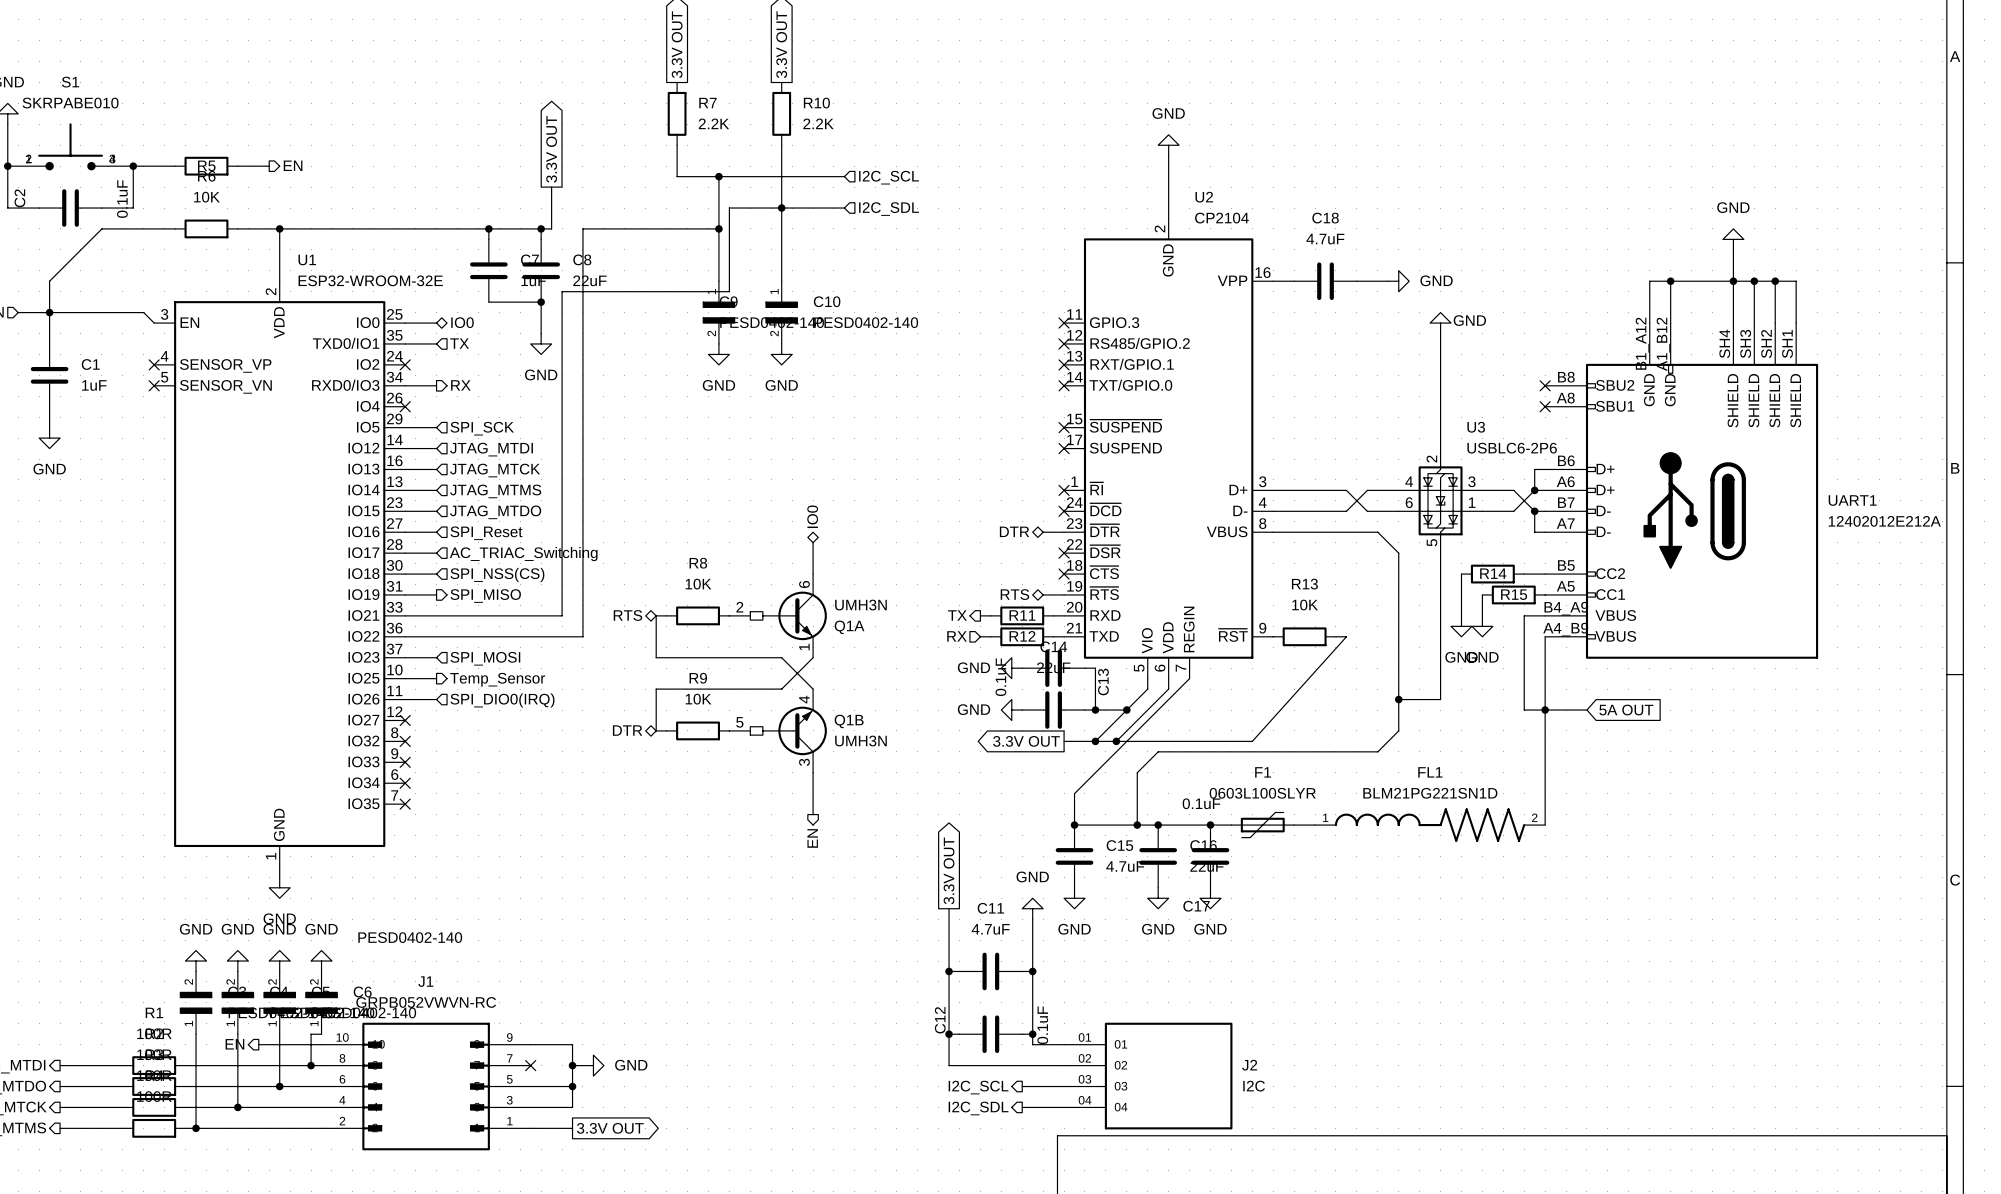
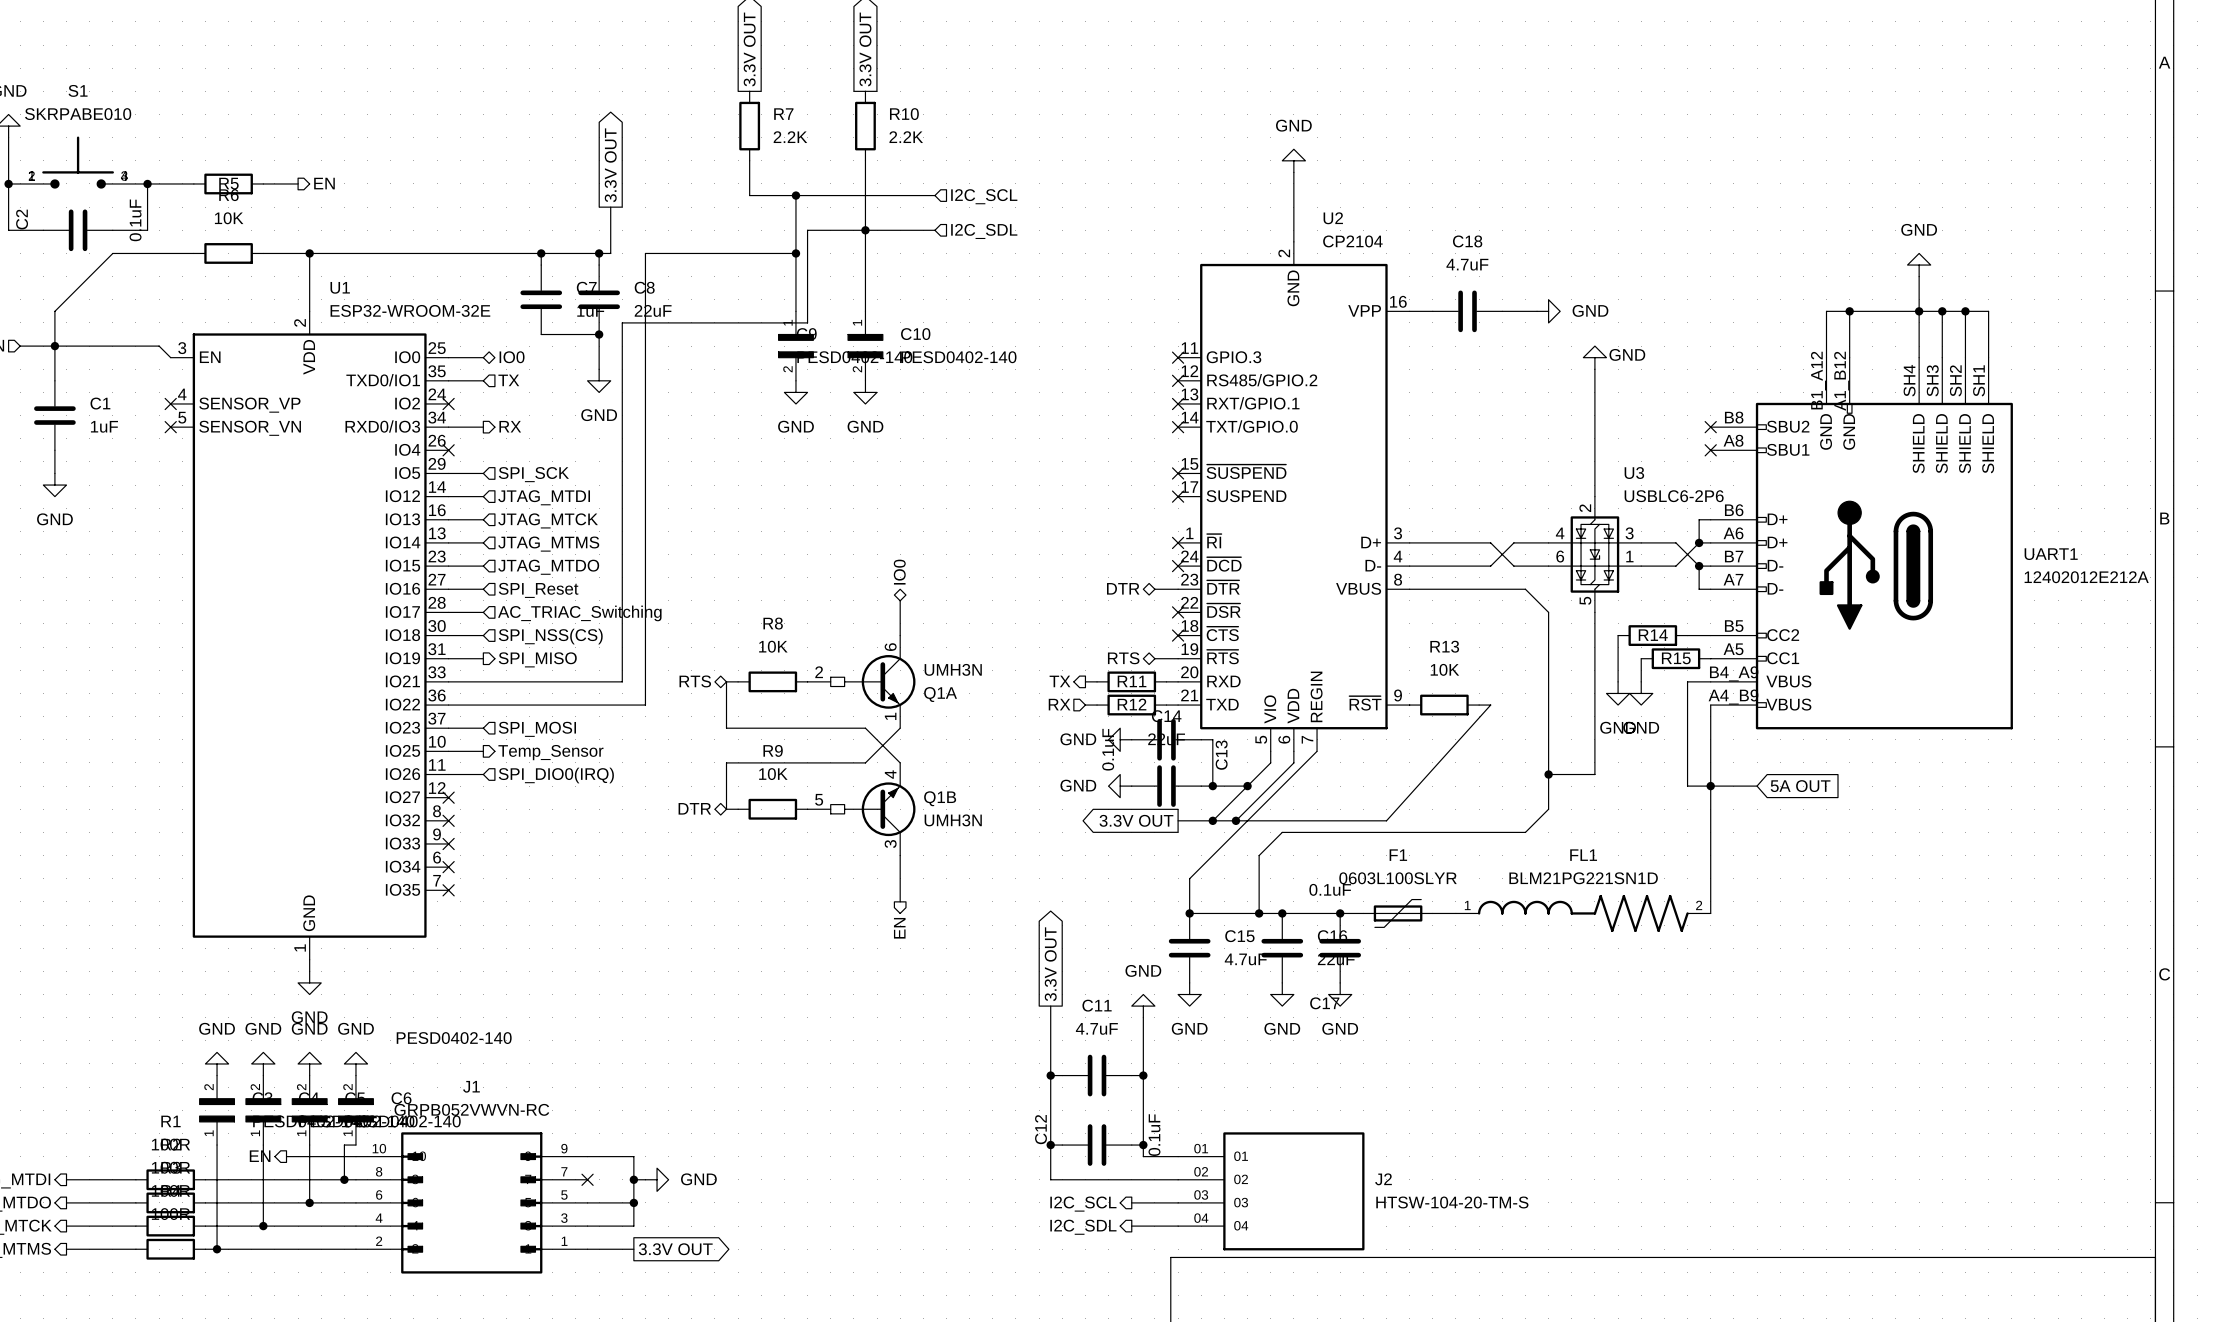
J2 value: I2C (1254, 1086) -> HTSW-104-20-TM-S (1452, 1202)

